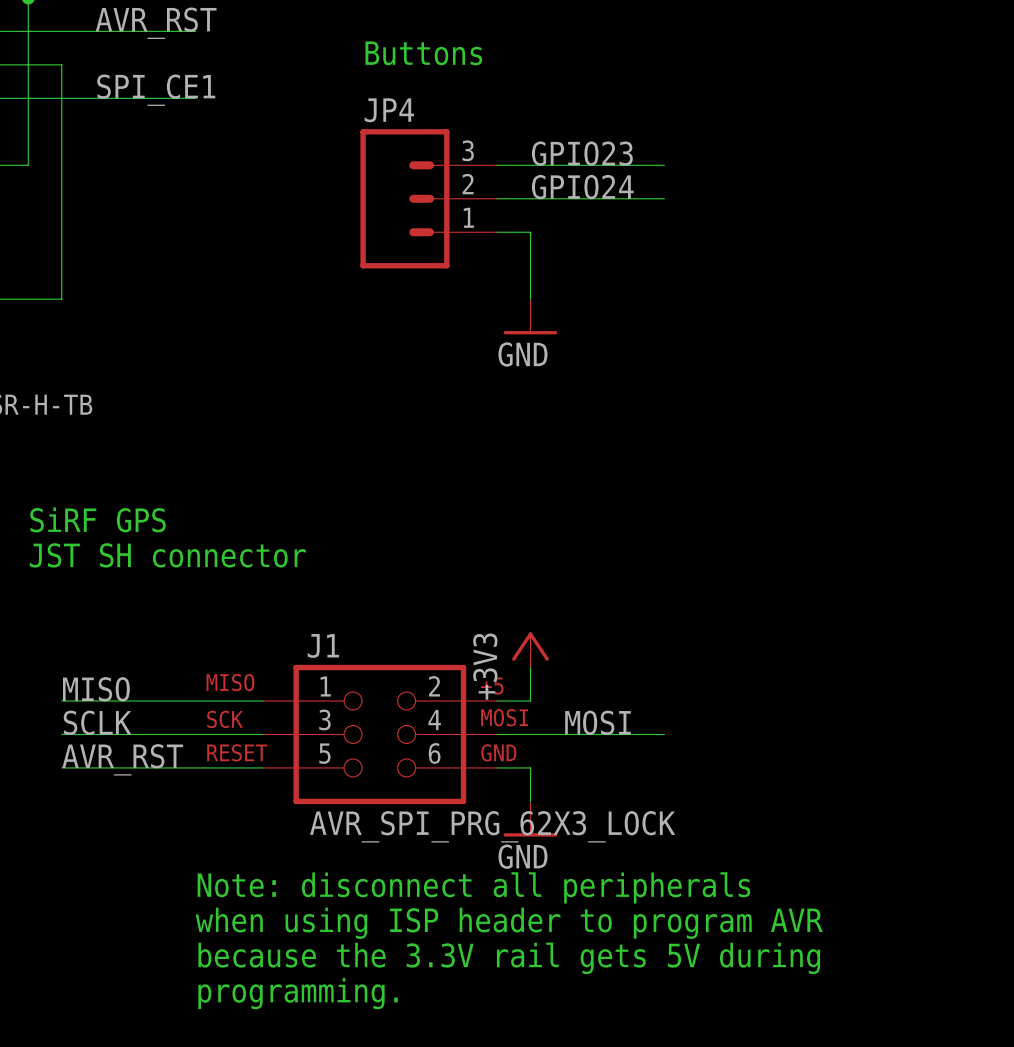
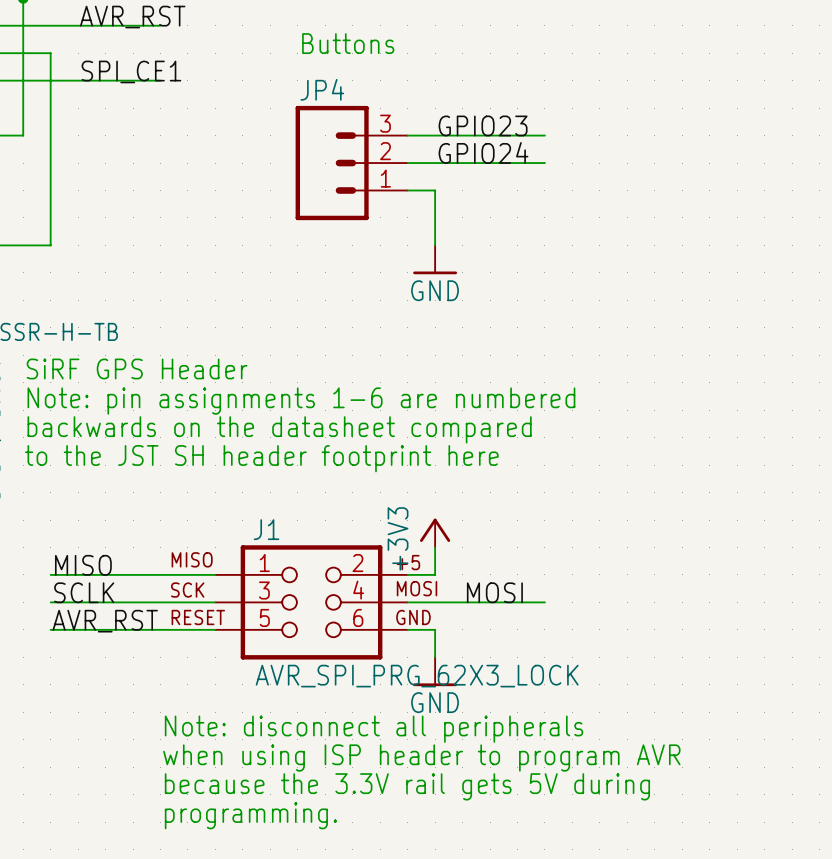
text: none -> SiRF GPS Header (137, 368)
text: none -> Note: pin assignments 1-6 are numbered (301, 401)
text: SiRF GPS (97, 519) -> backwards on the datasheet compared (279, 429)
text: JST SH connector (167, 555) -> to the JST SH header footprint here (261, 458)

